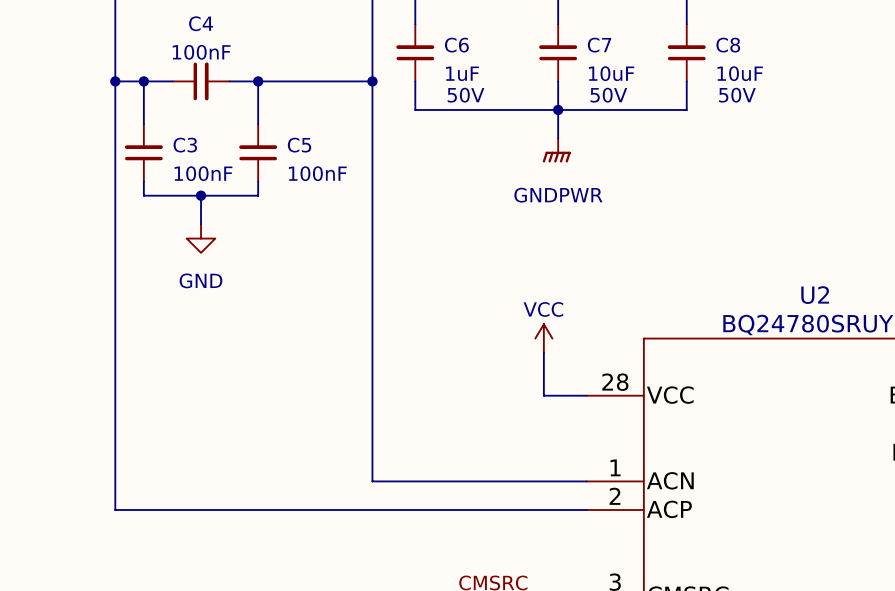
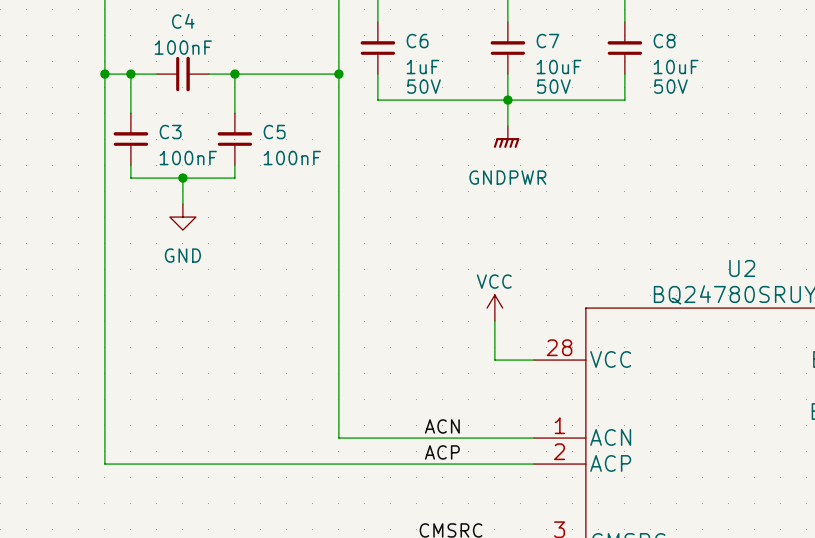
label: none -> ACN (442, 426)
label: none -> ACP (442, 452)

